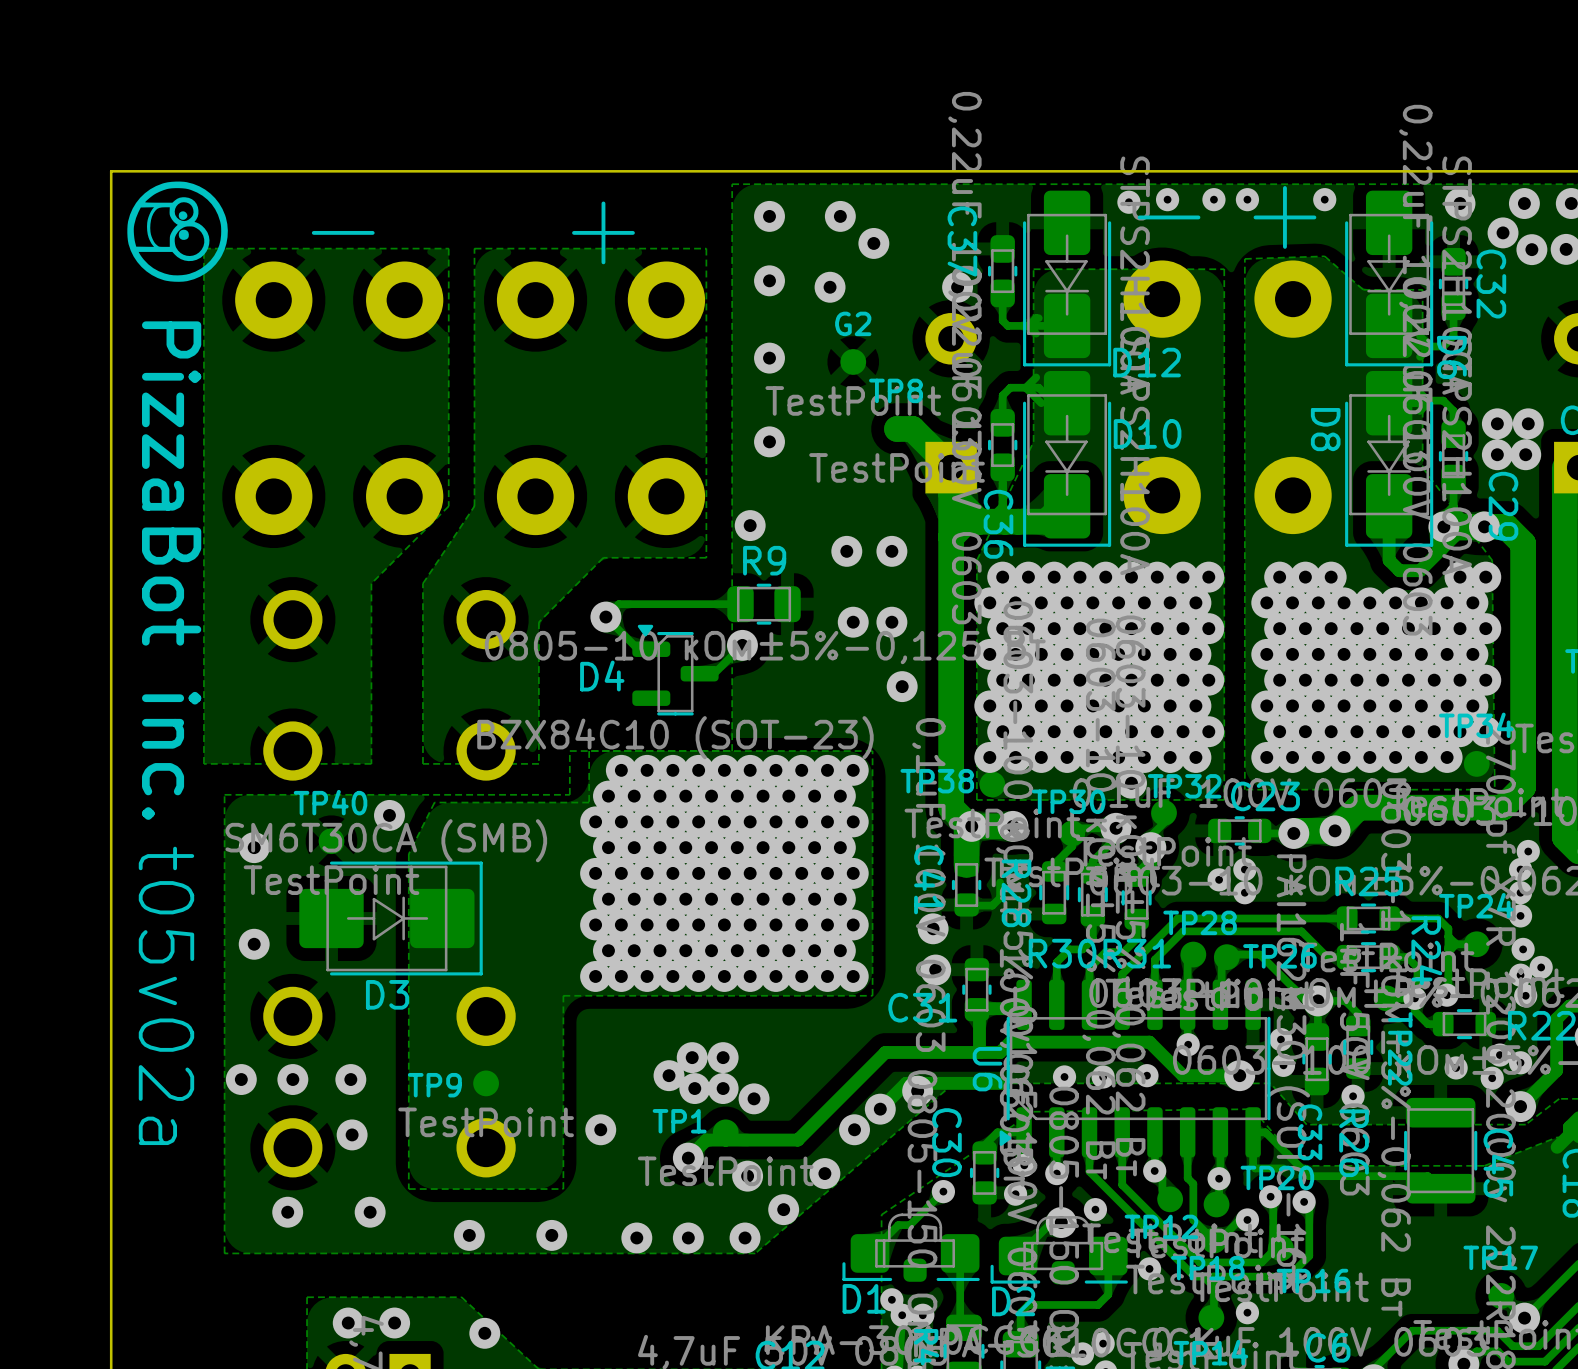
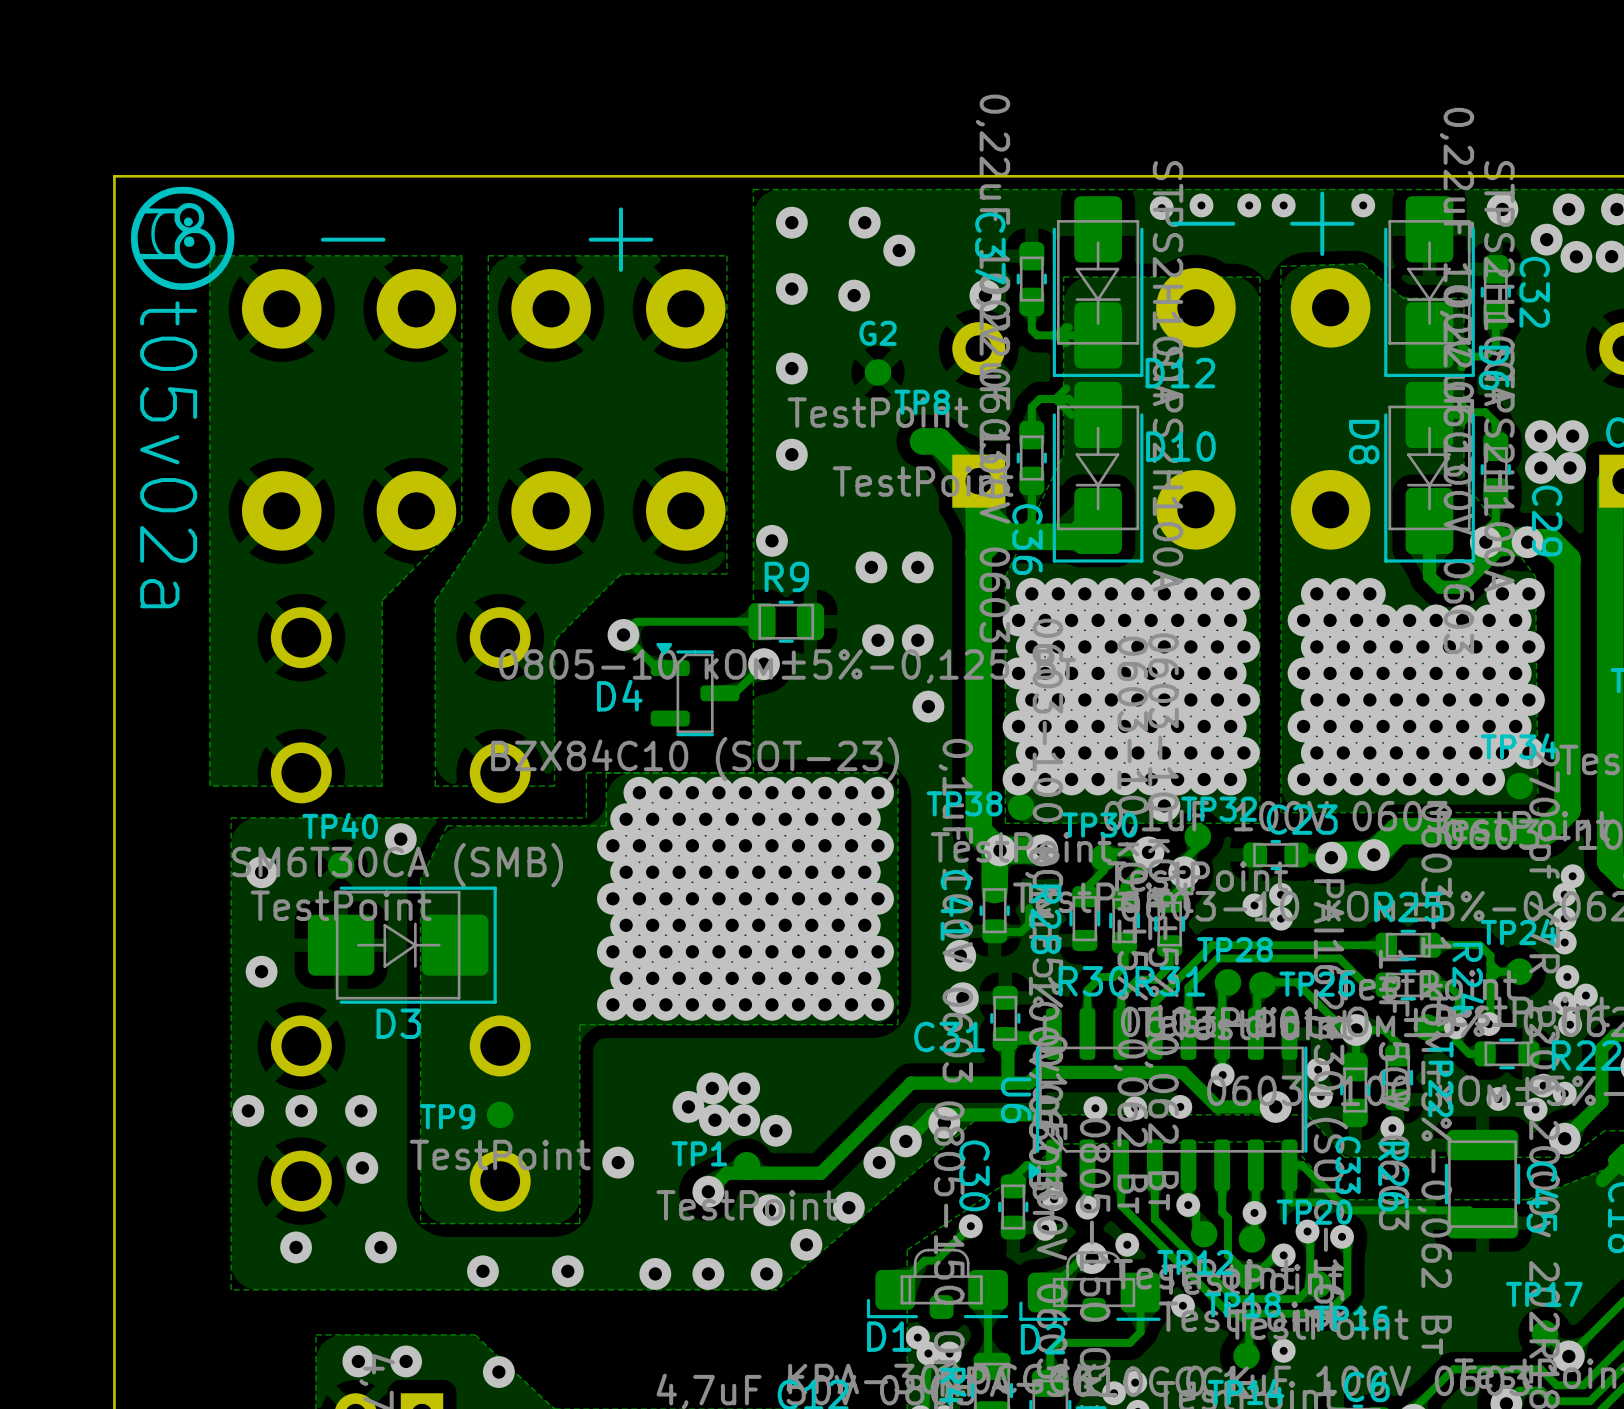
text: PizzaBot inc. (171, 570) -> t05v02a (168, 454)
text: t05v02a (166, 995) -> none

